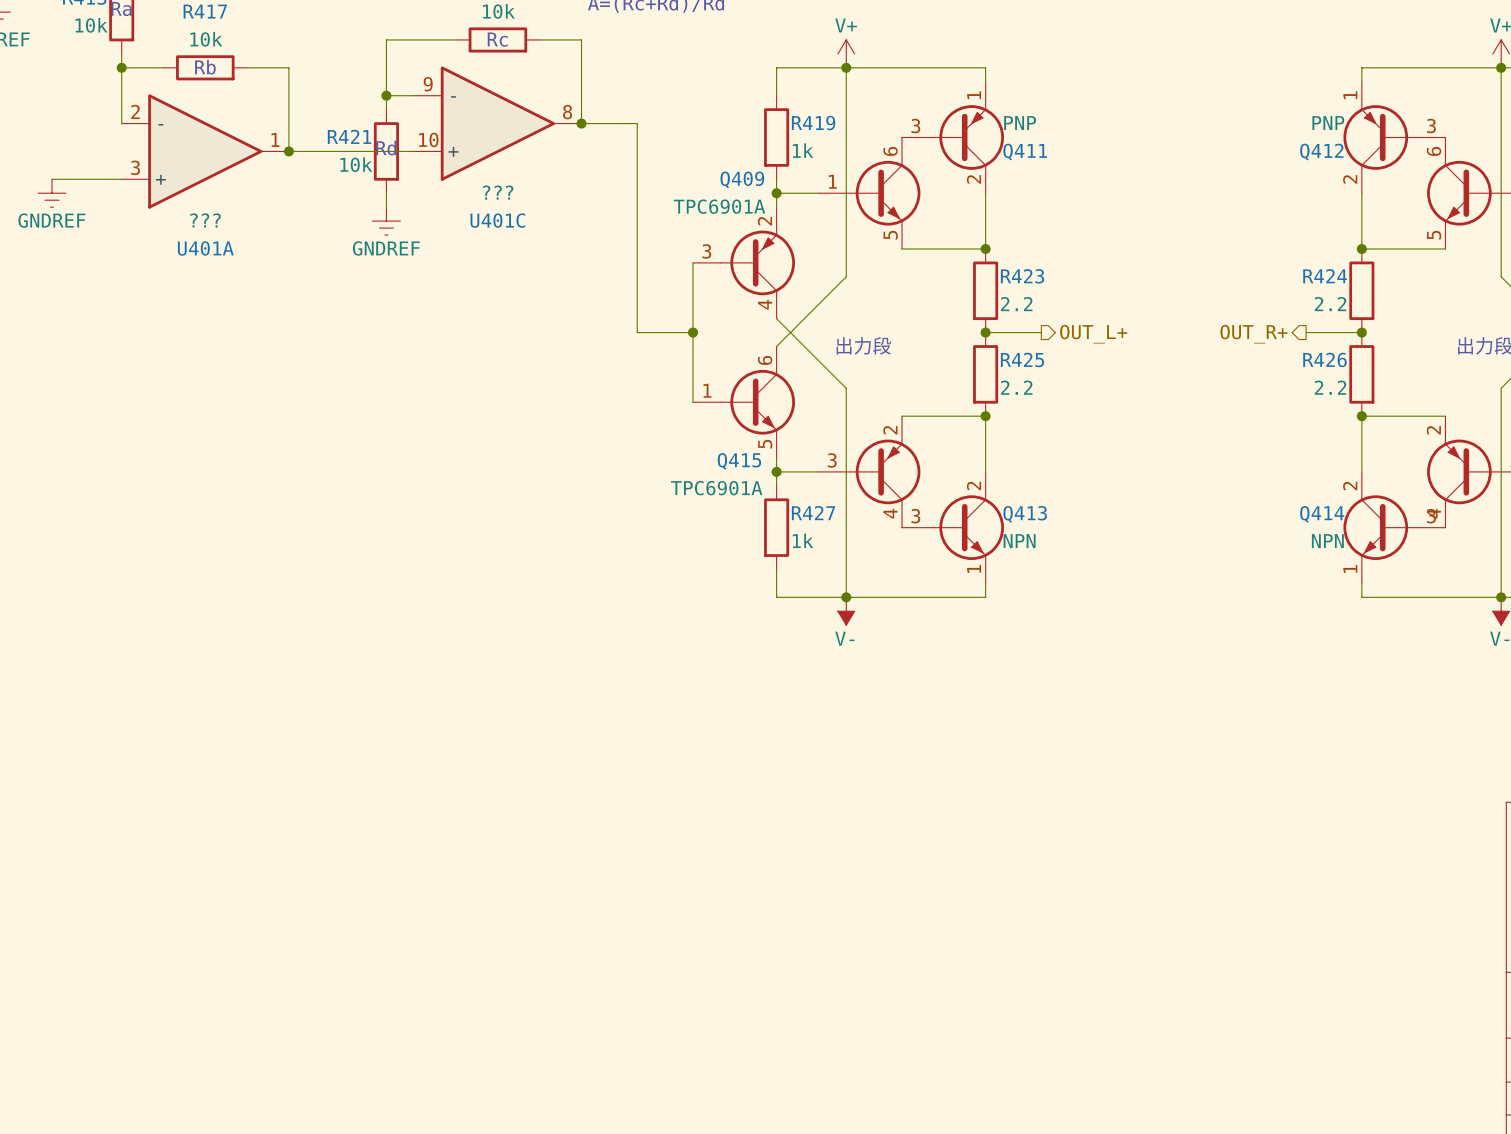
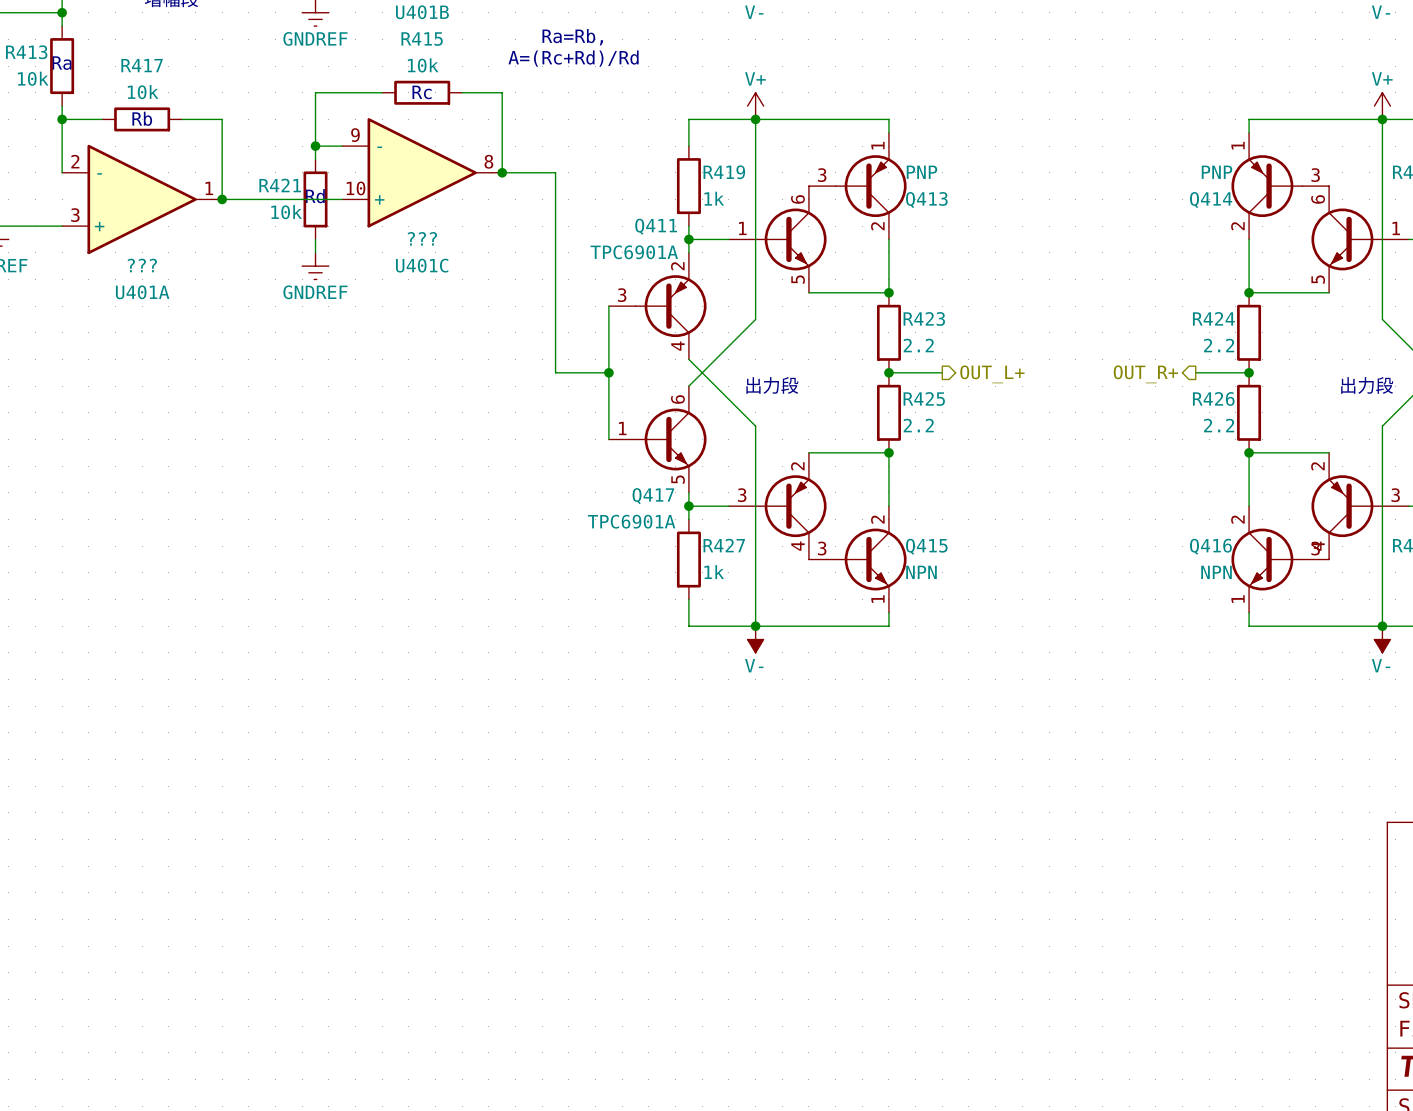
Q411 name: Q411 (1025, 152) -> Q413 (926, 200)
Q412 name: Q412 (1321, 152) -> Q414 (1211, 200)
Q409 name: Q409 (742, 179) -> Q411 (656, 226)
Q415 name: Q415 (739, 461) -> Q417 (653, 496)
Q413 name: Q413 (1025, 514) -> Q415 (926, 546)
Q414 name: Q414 (1322, 514) -> Q416 (1210, 546)

